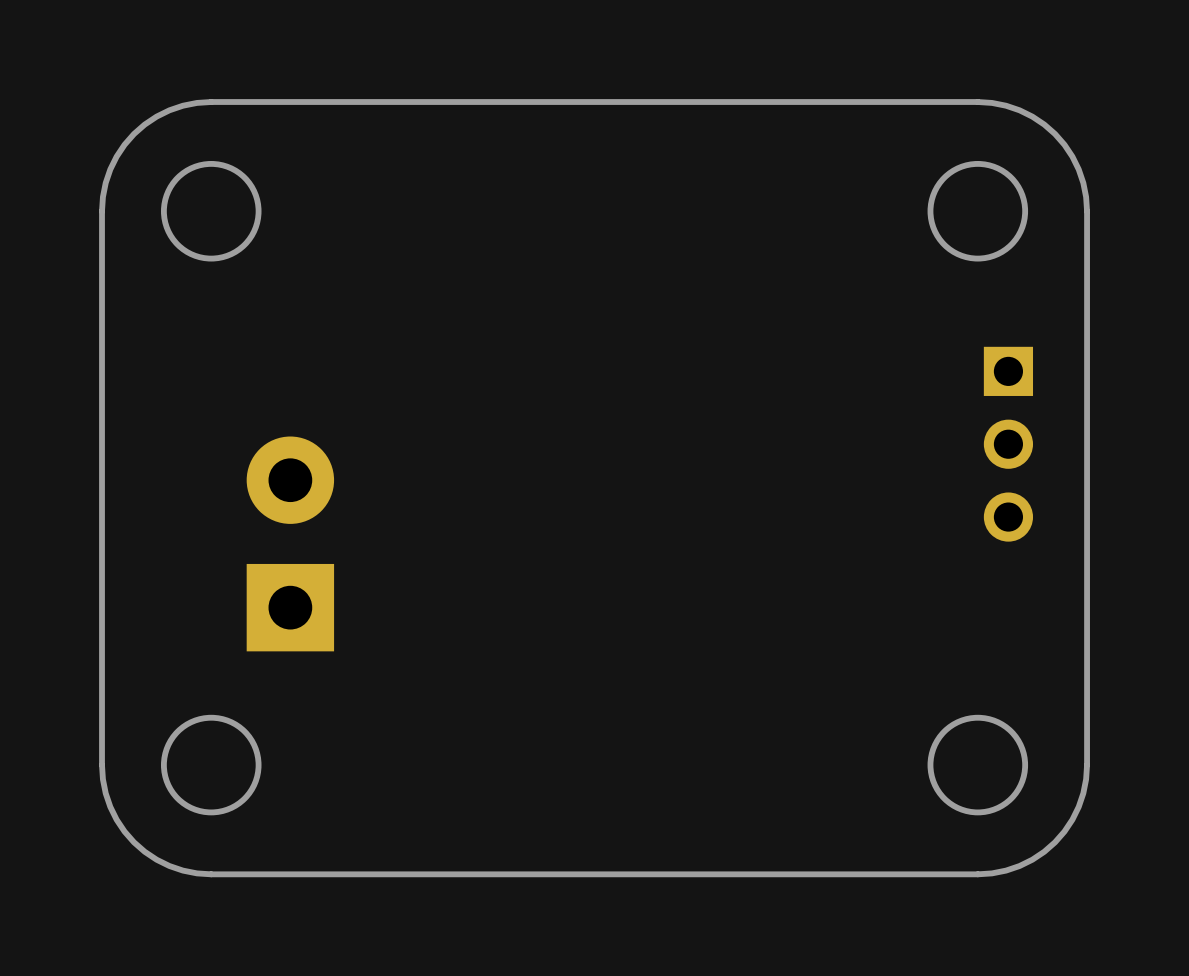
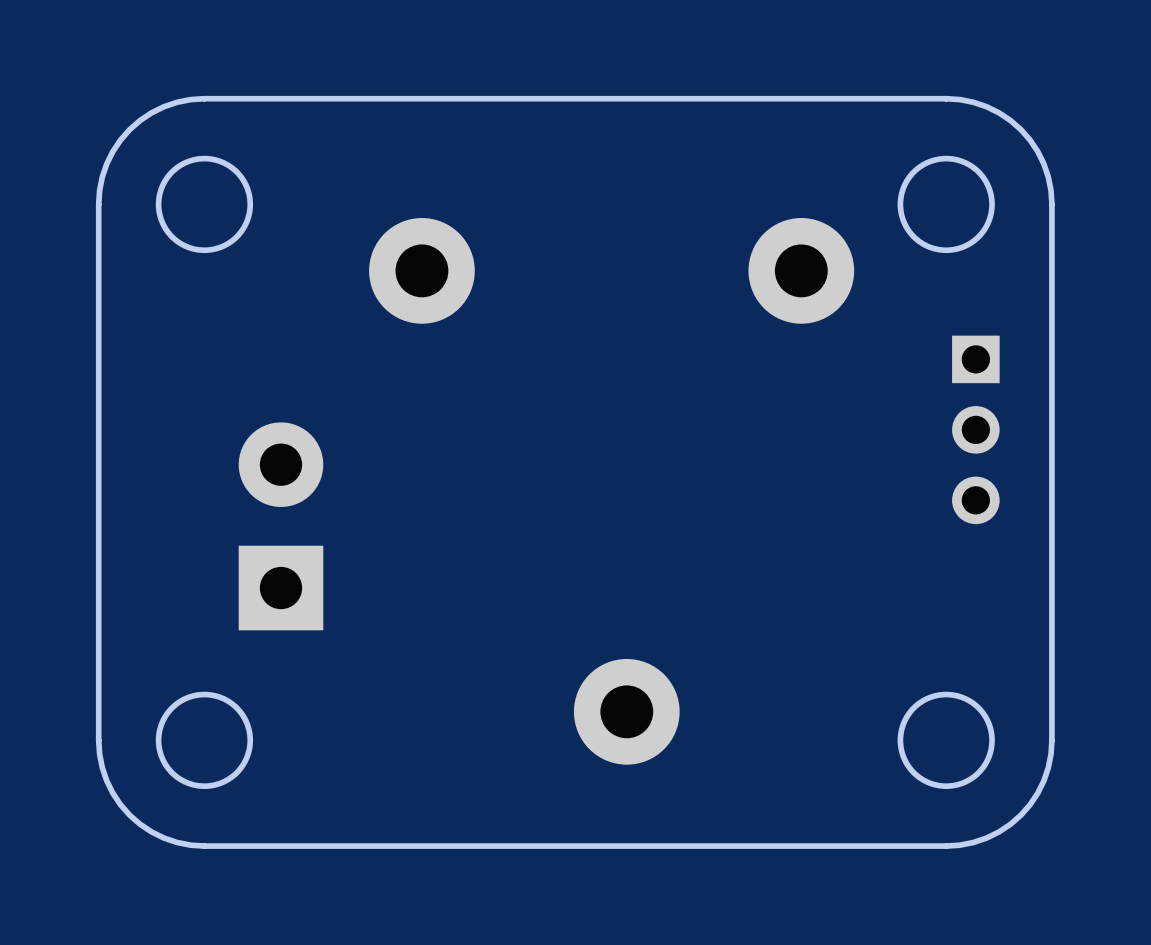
part: none -> (421, 270)
part: none -> (801, 270)
part: none -> (626, 711)

